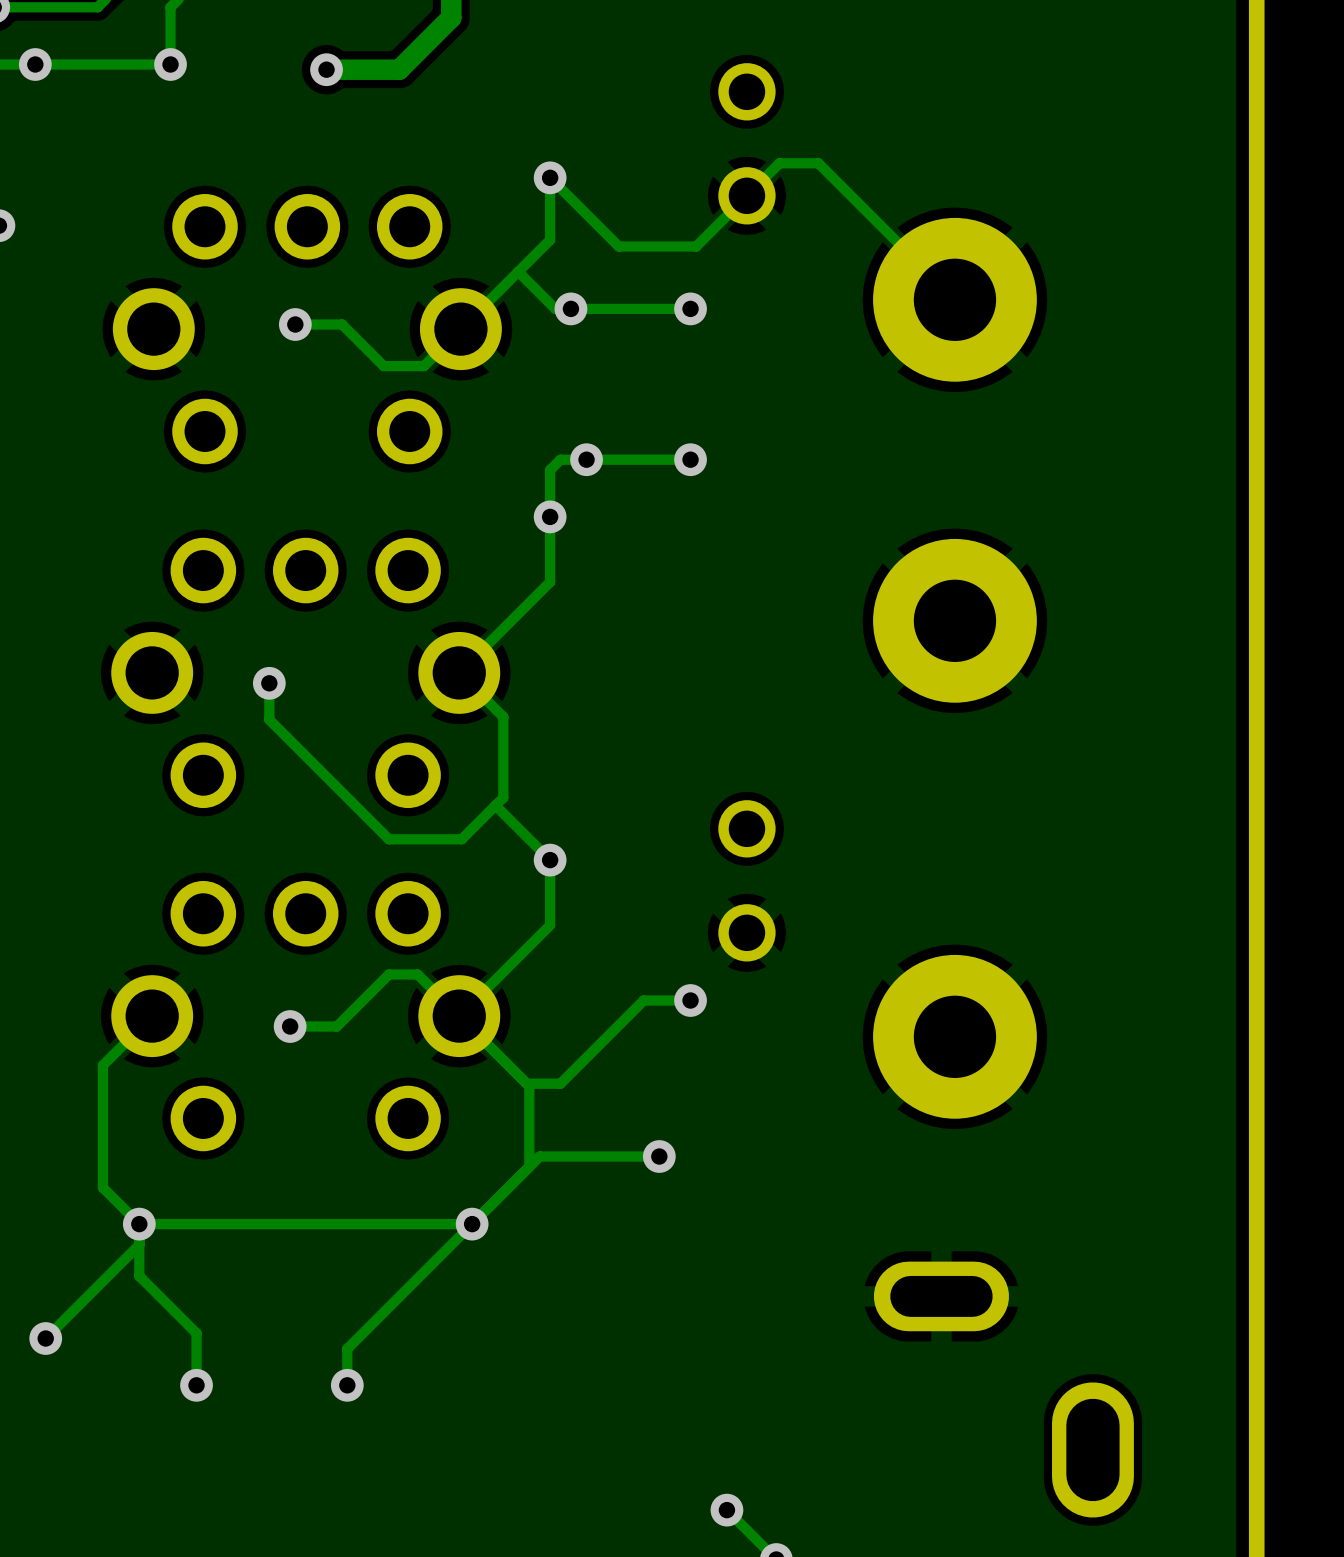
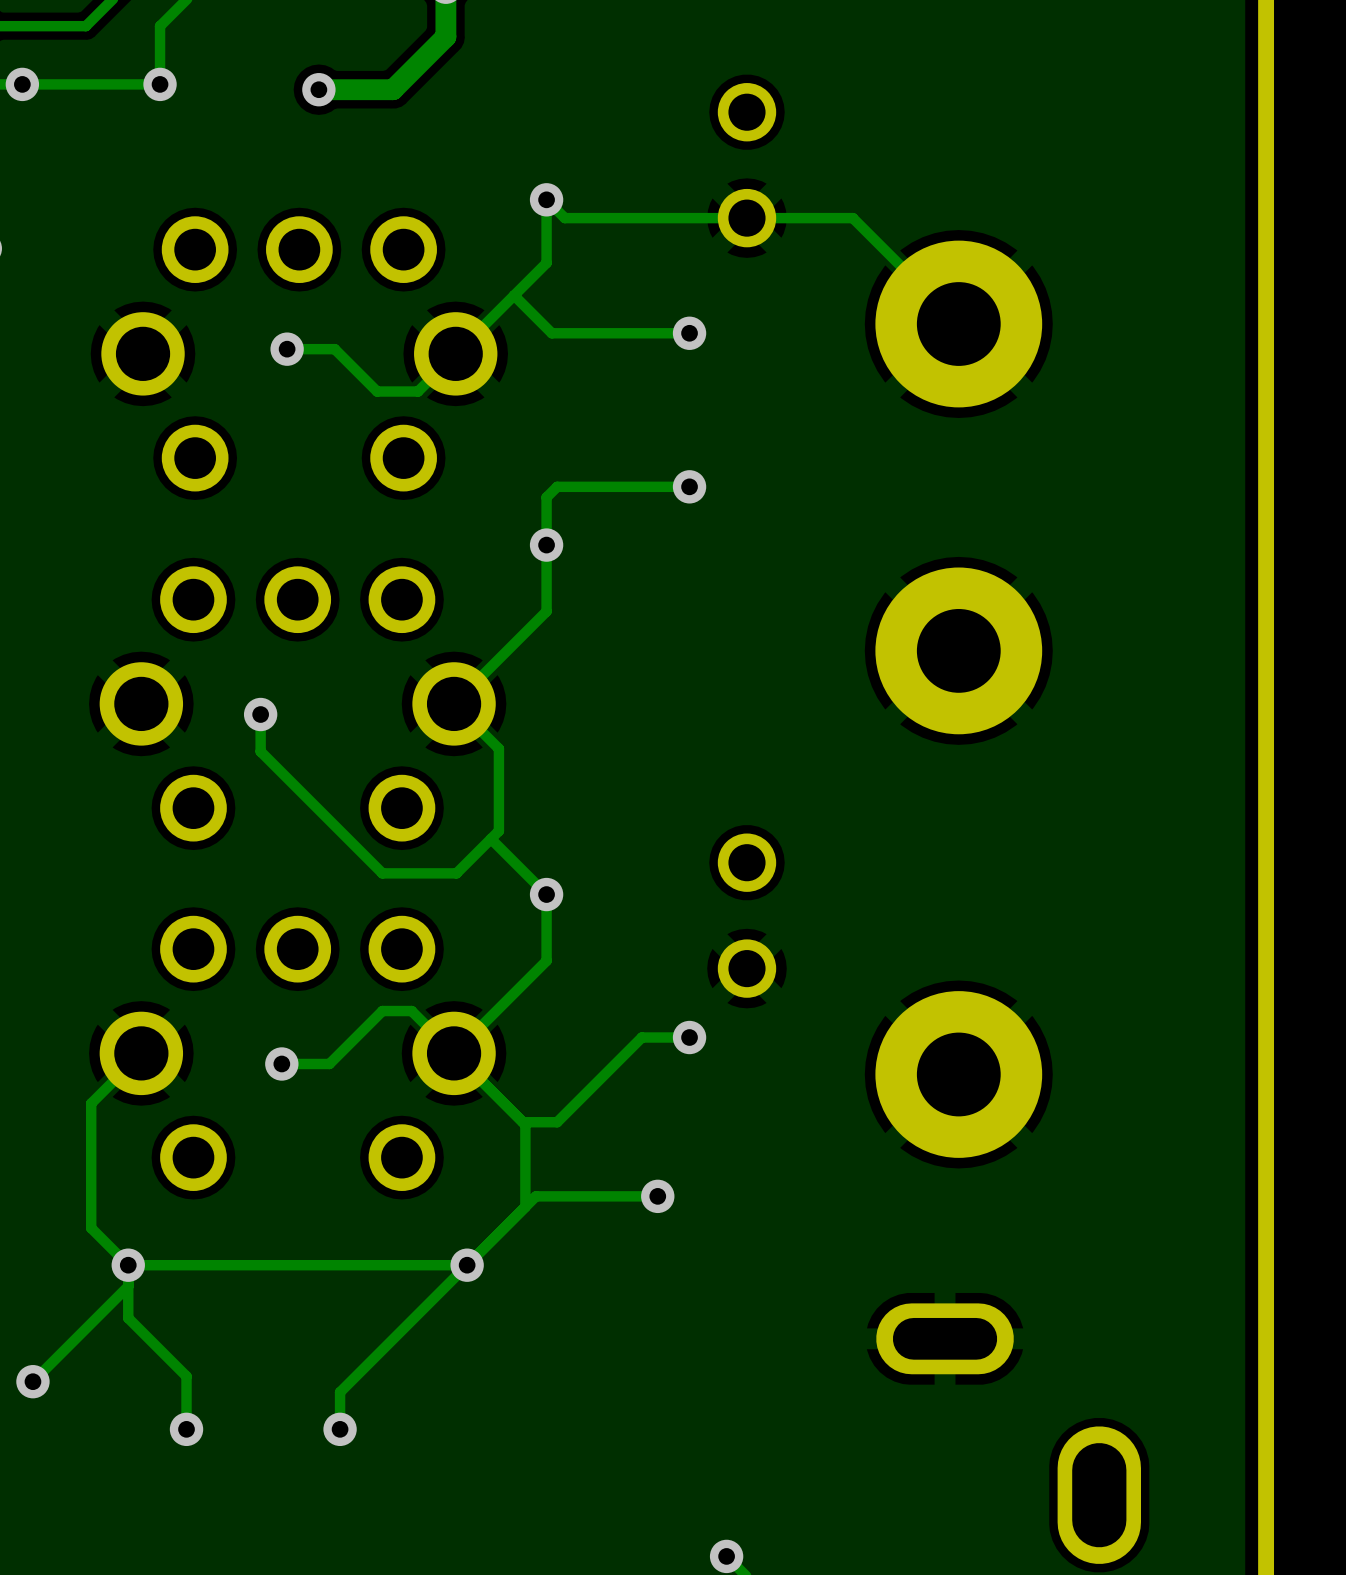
track: (850, 195) (818, 163) (779, 163) (696, 246) (618, 246) (568, 195) -> (852, 218) (564, 218)
via: (570, 308) -> none
via: (586, 459) -> none

